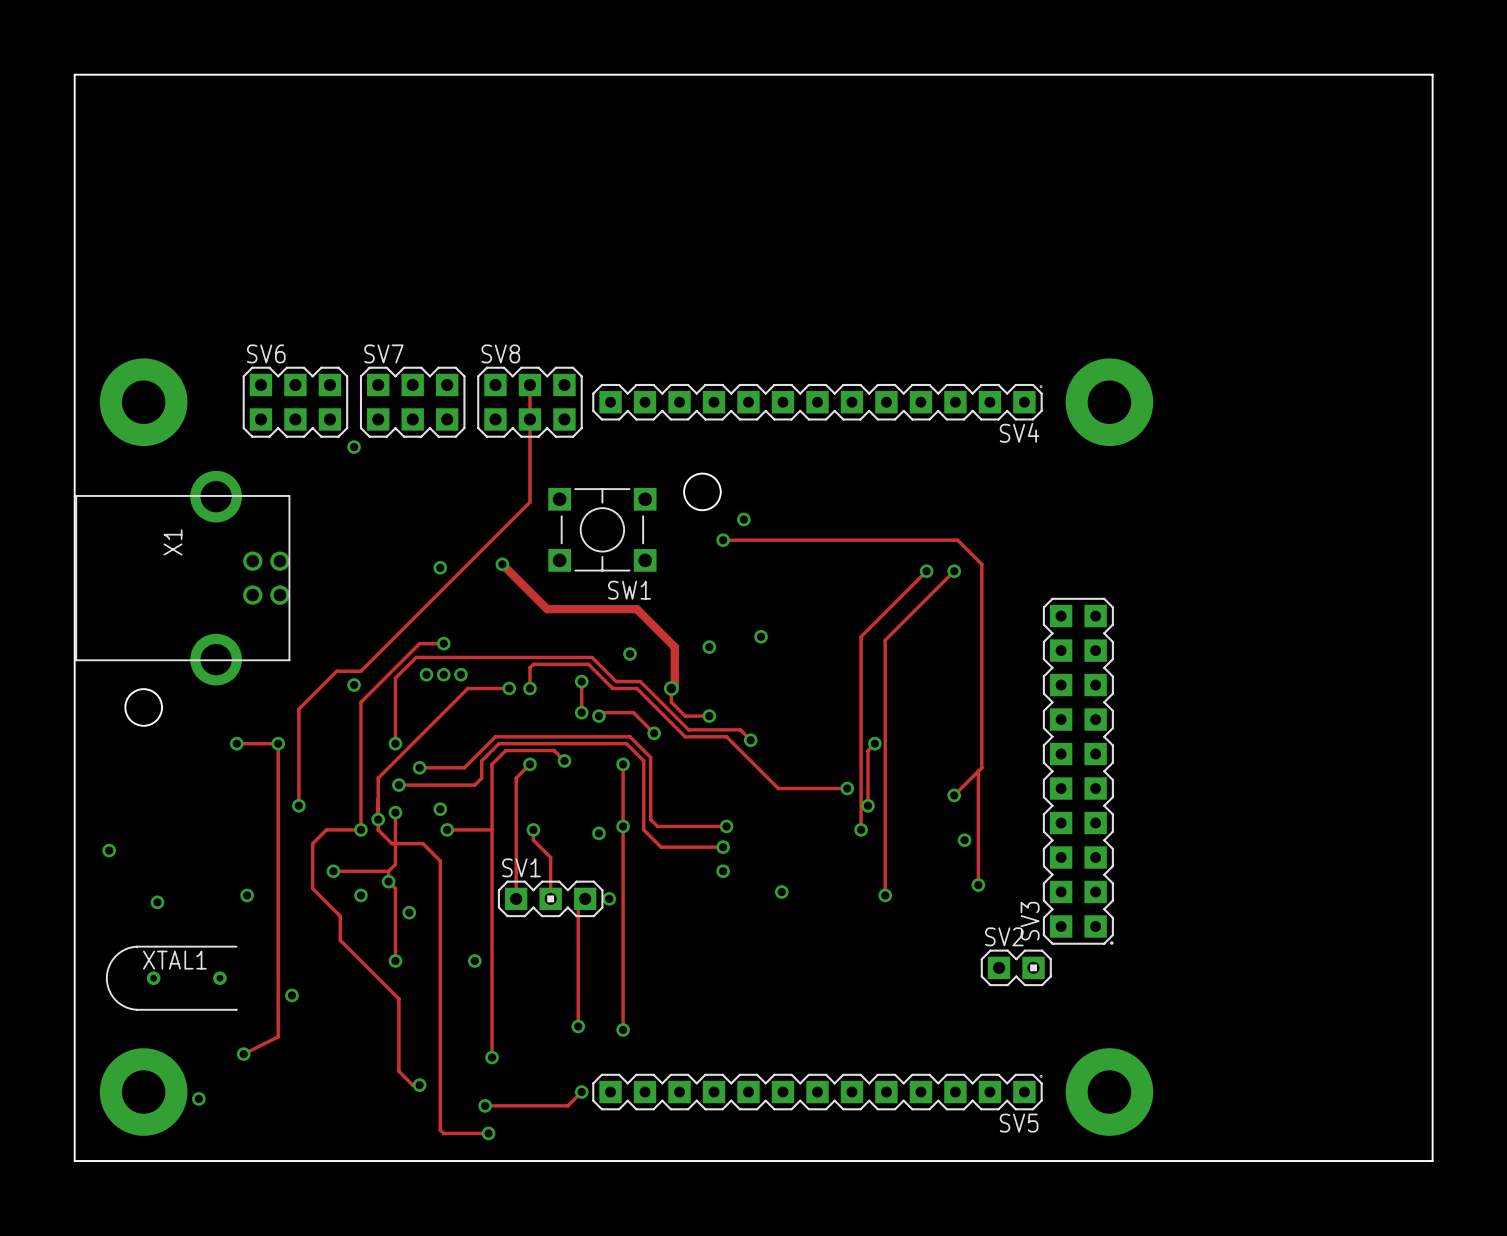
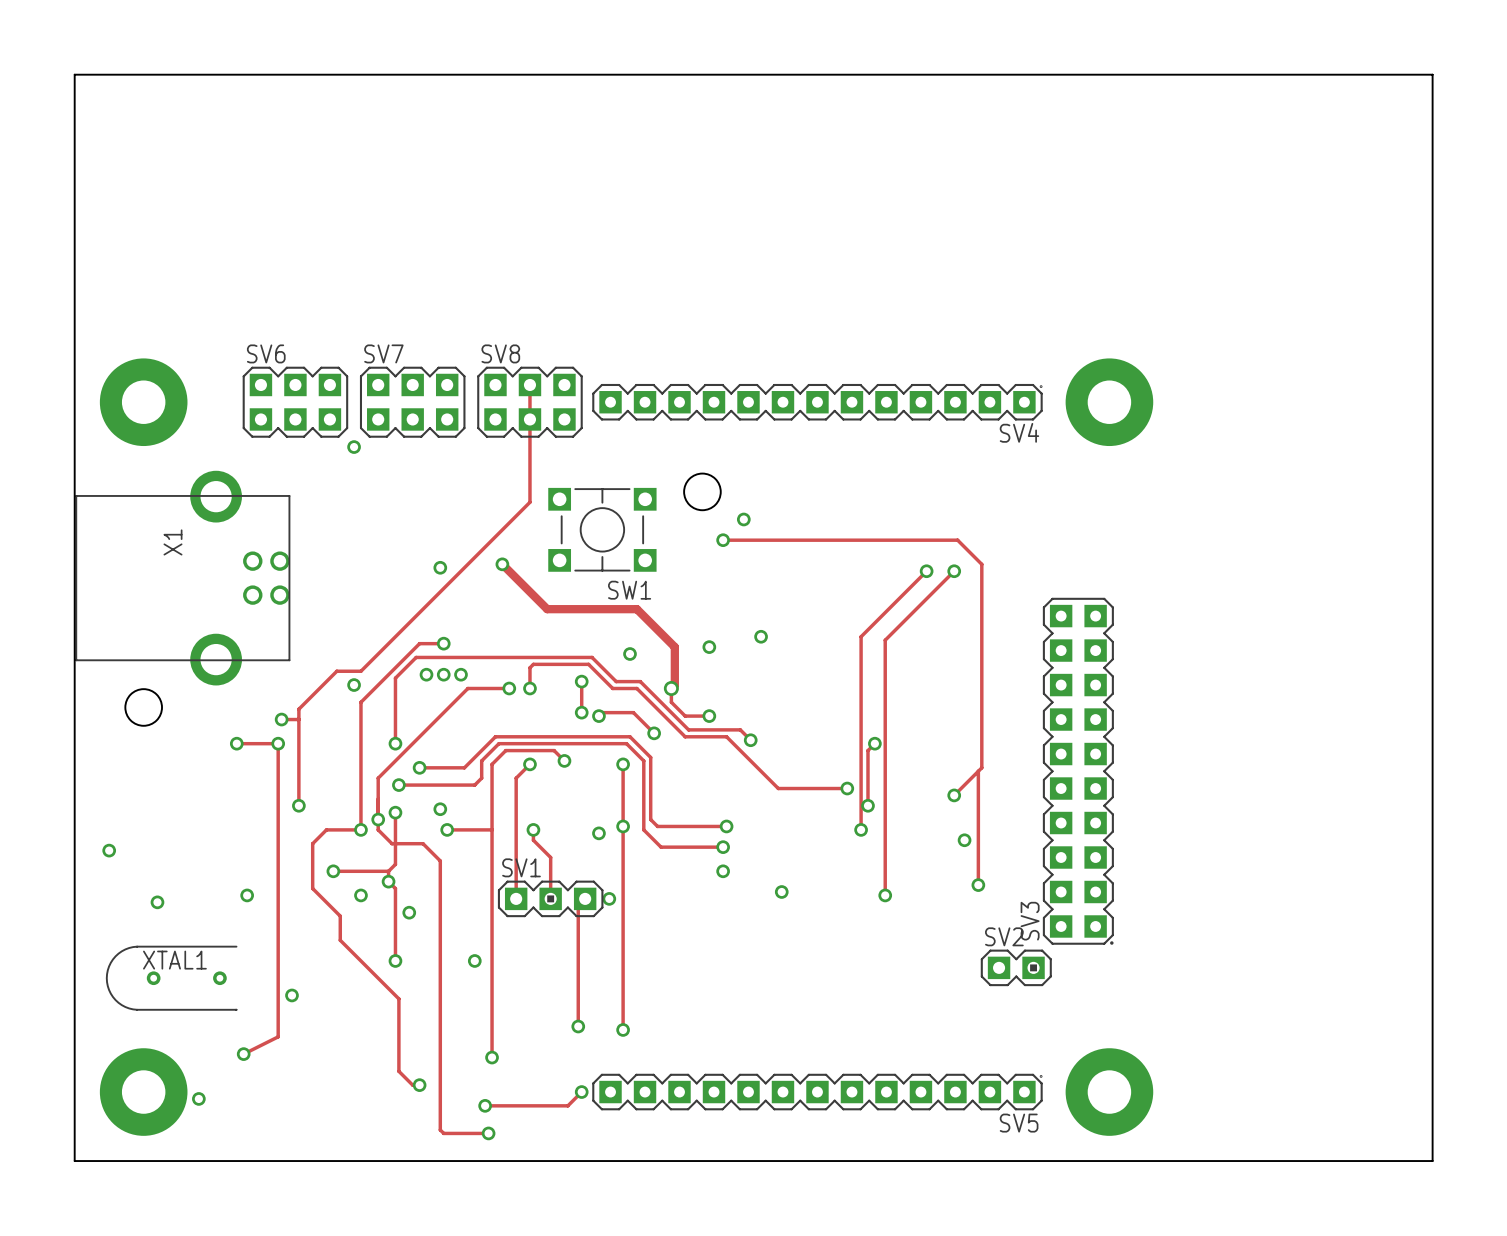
track: none -> (281, 719) (298, 719)
via: none -> (281, 719)

